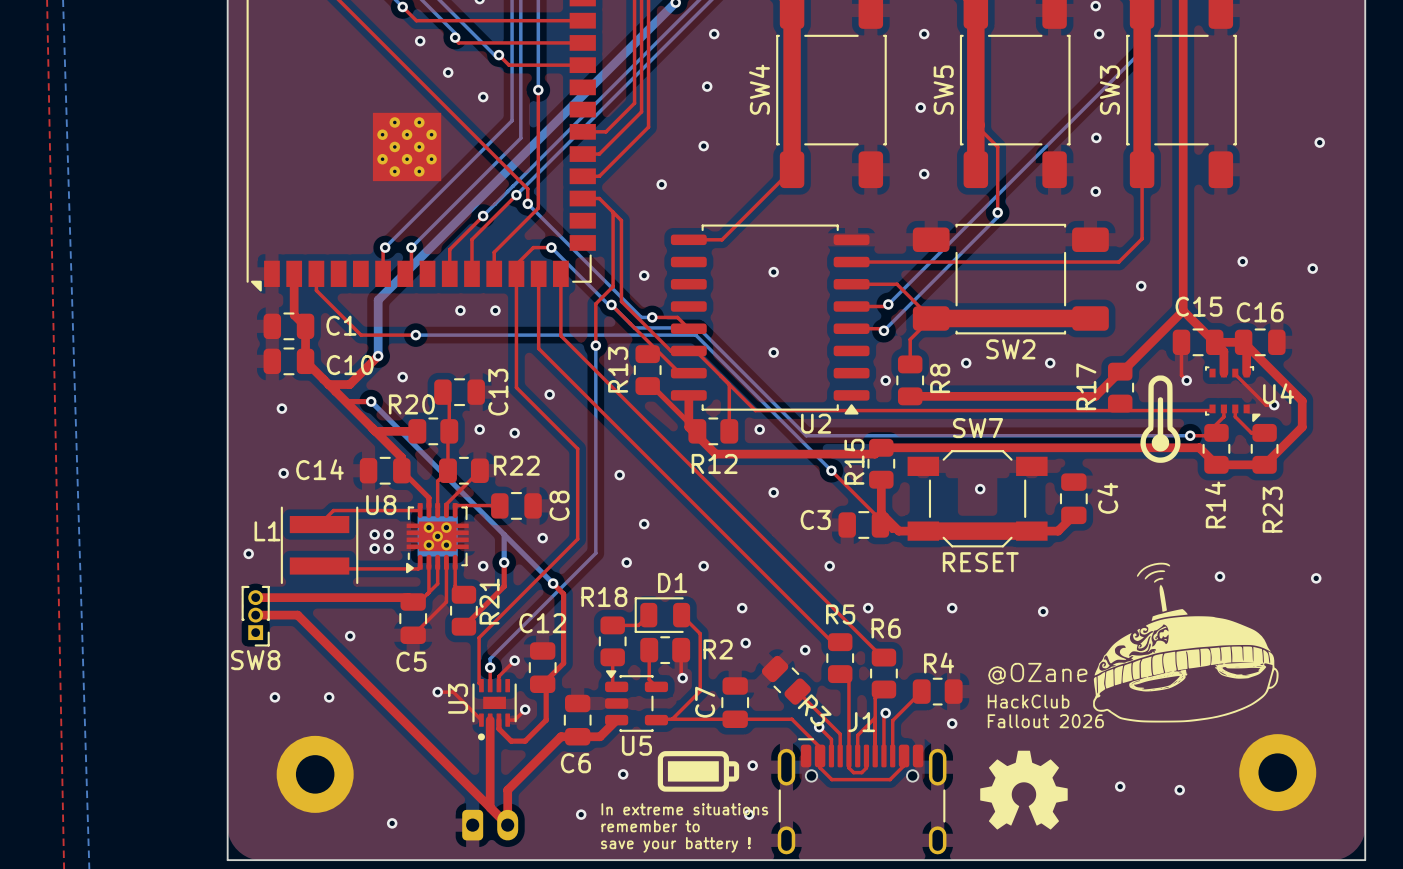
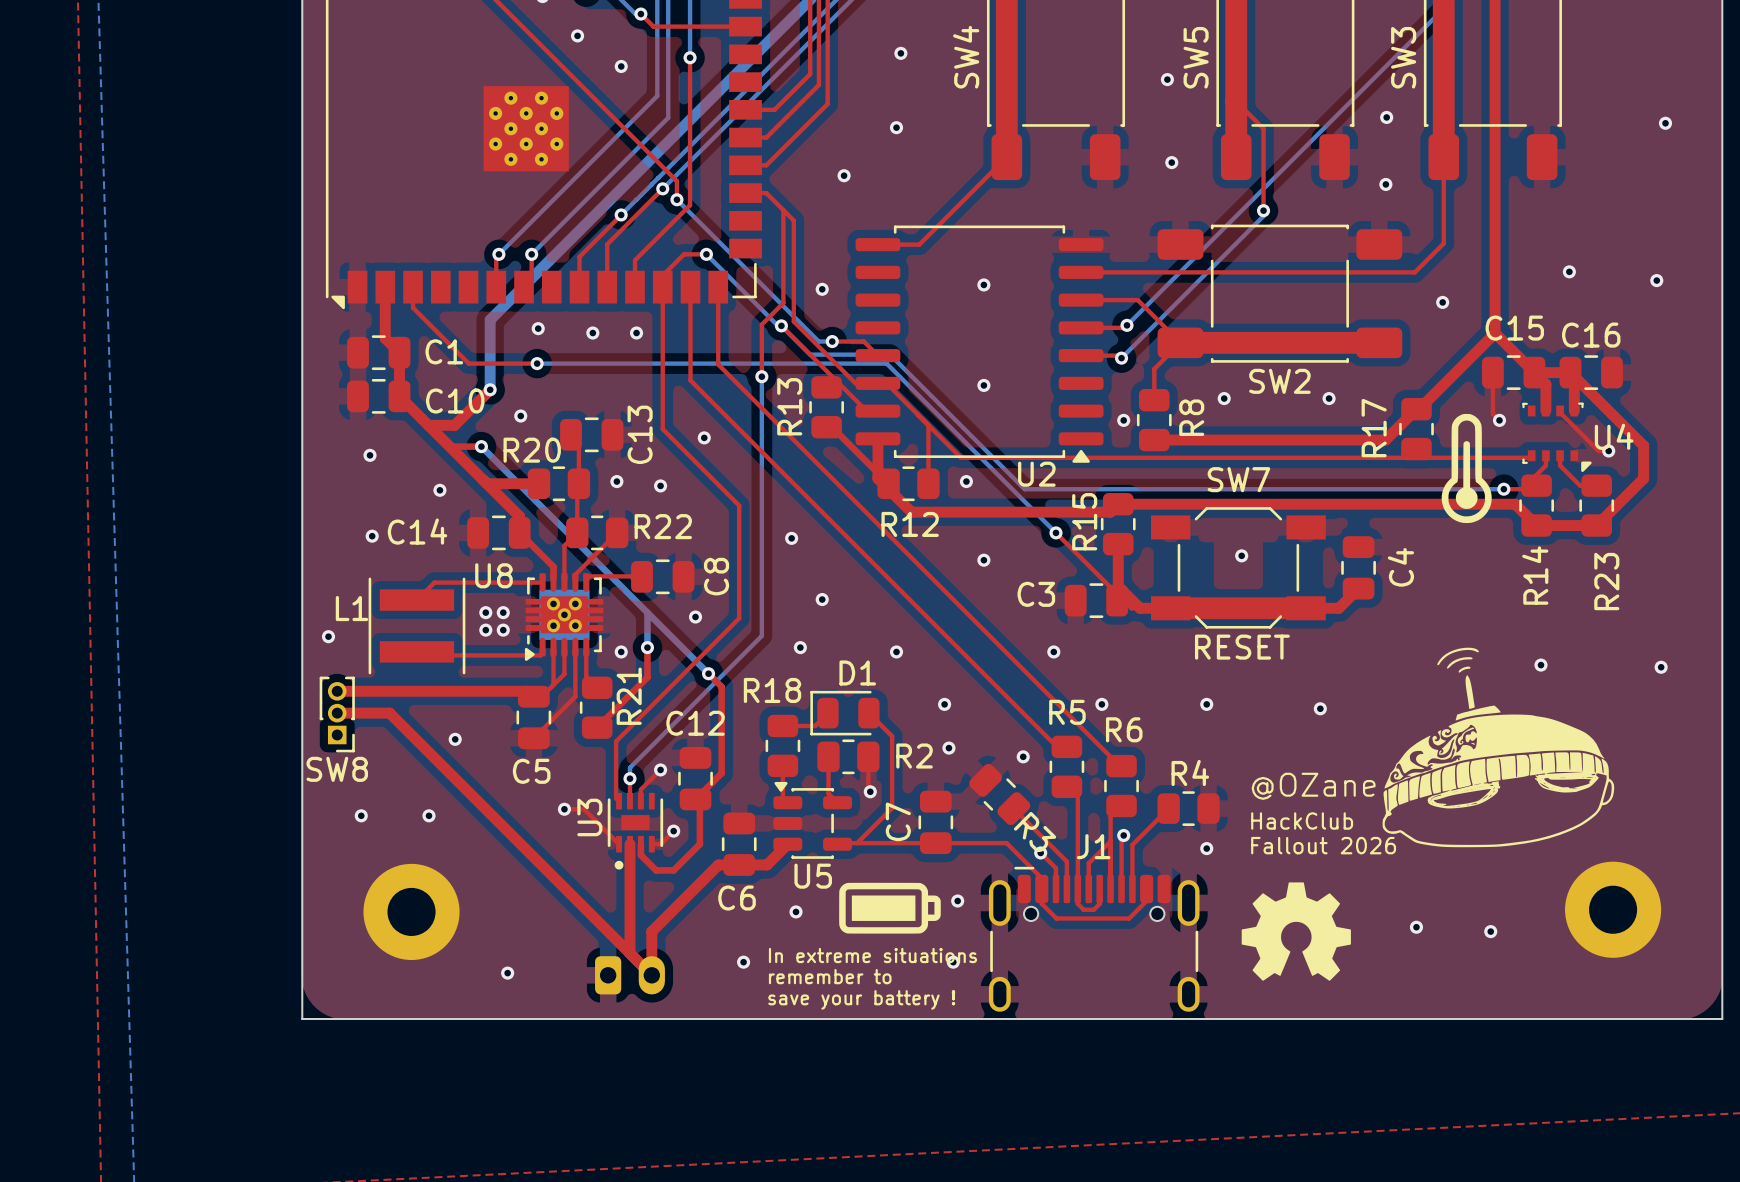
via: none -> (538, 328)
via: none -> (439, 490)

